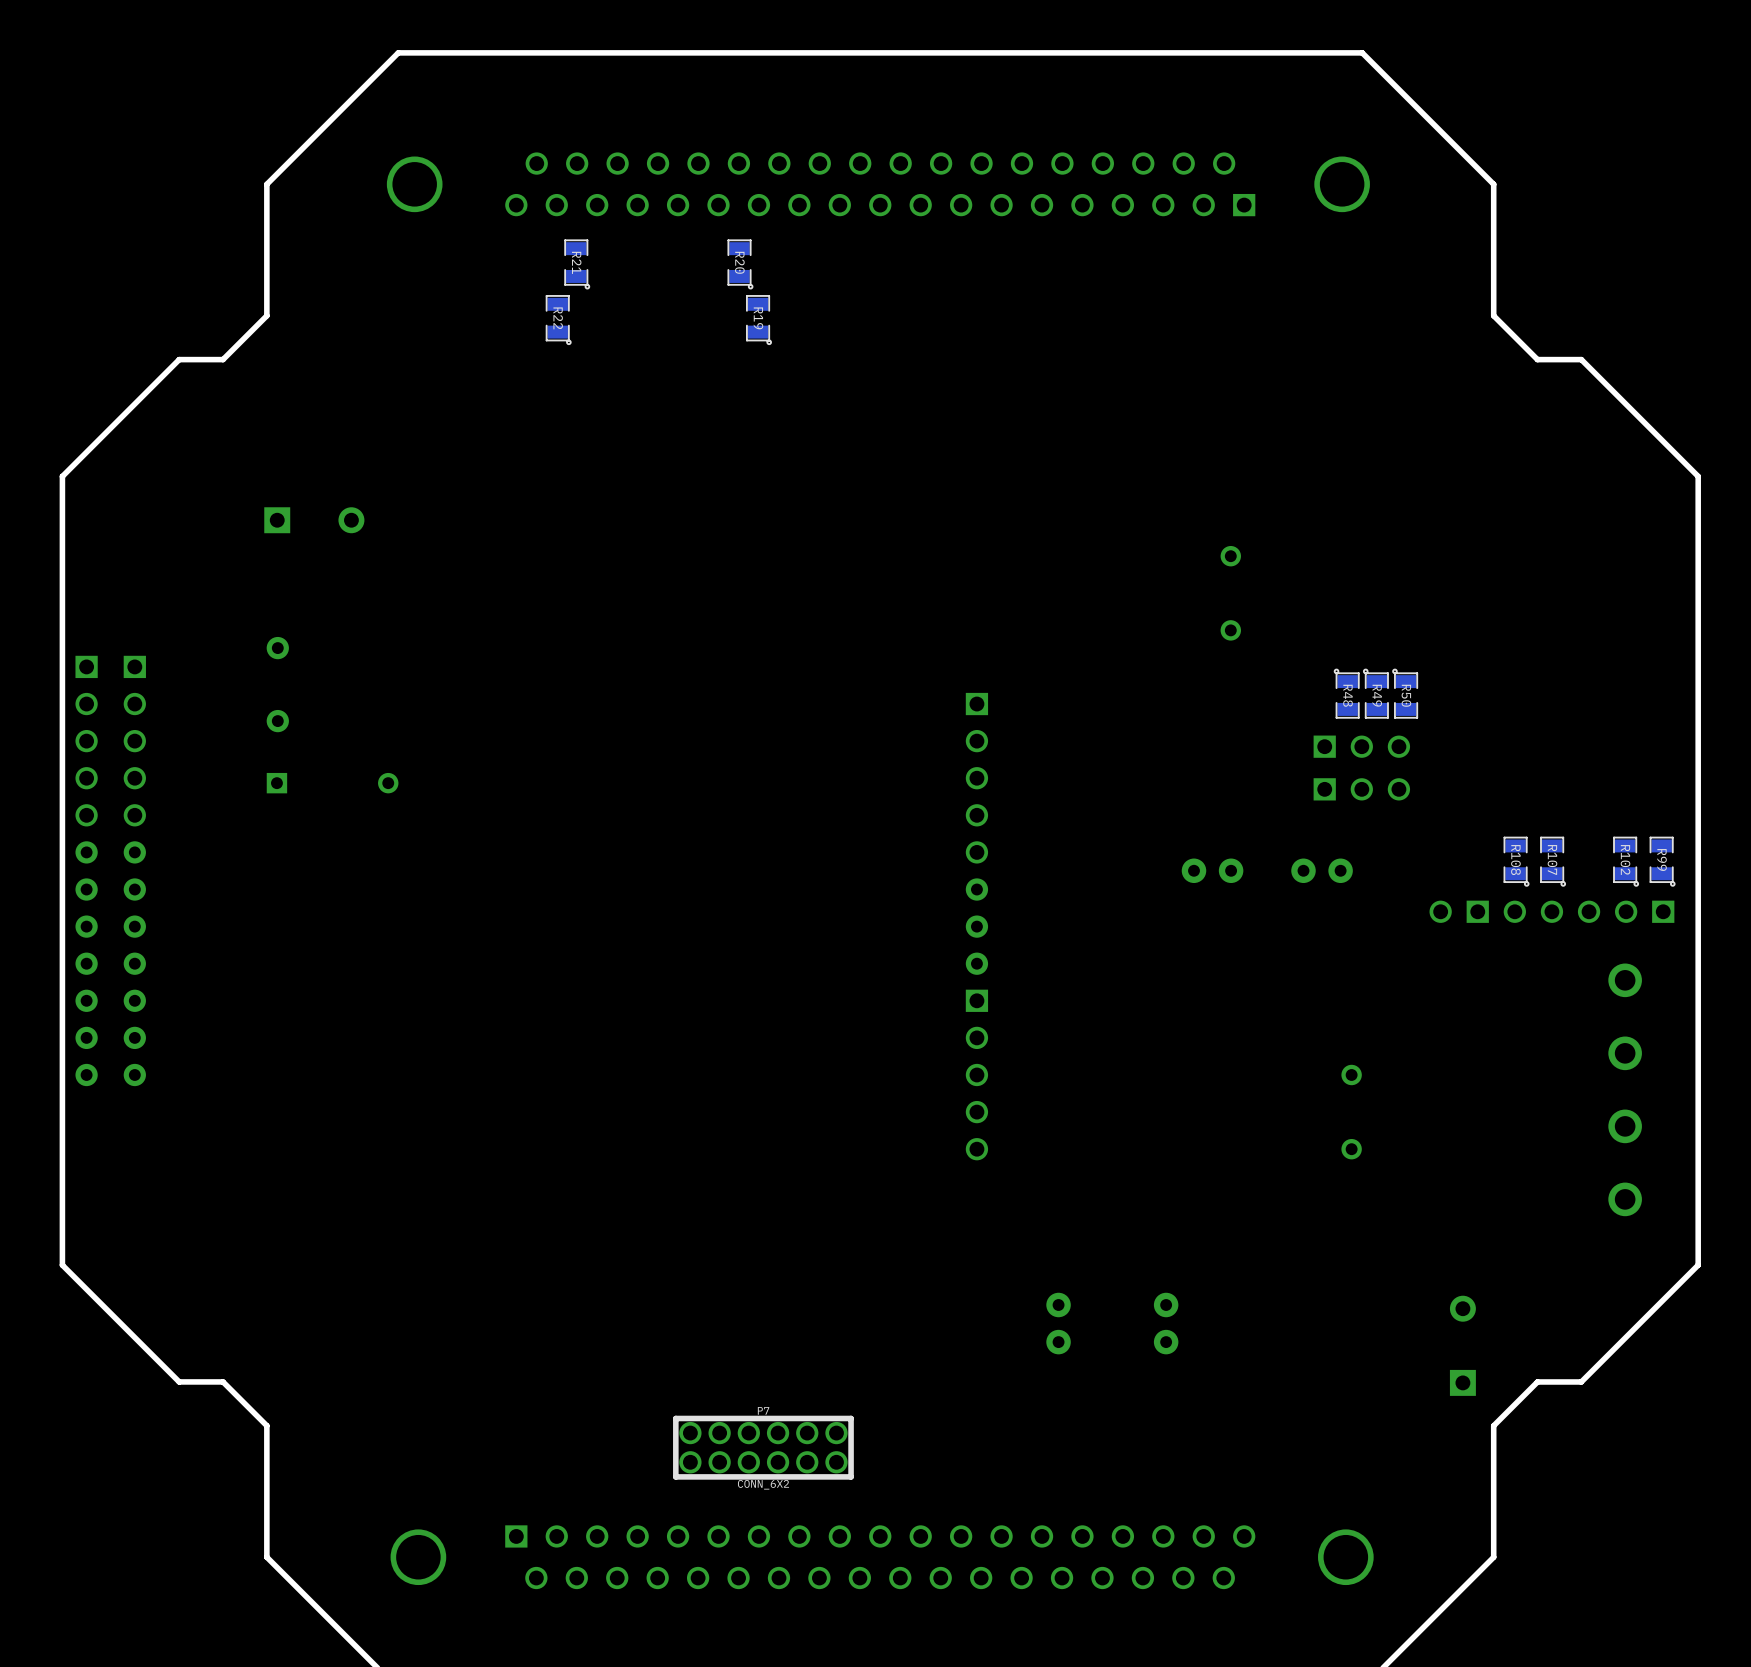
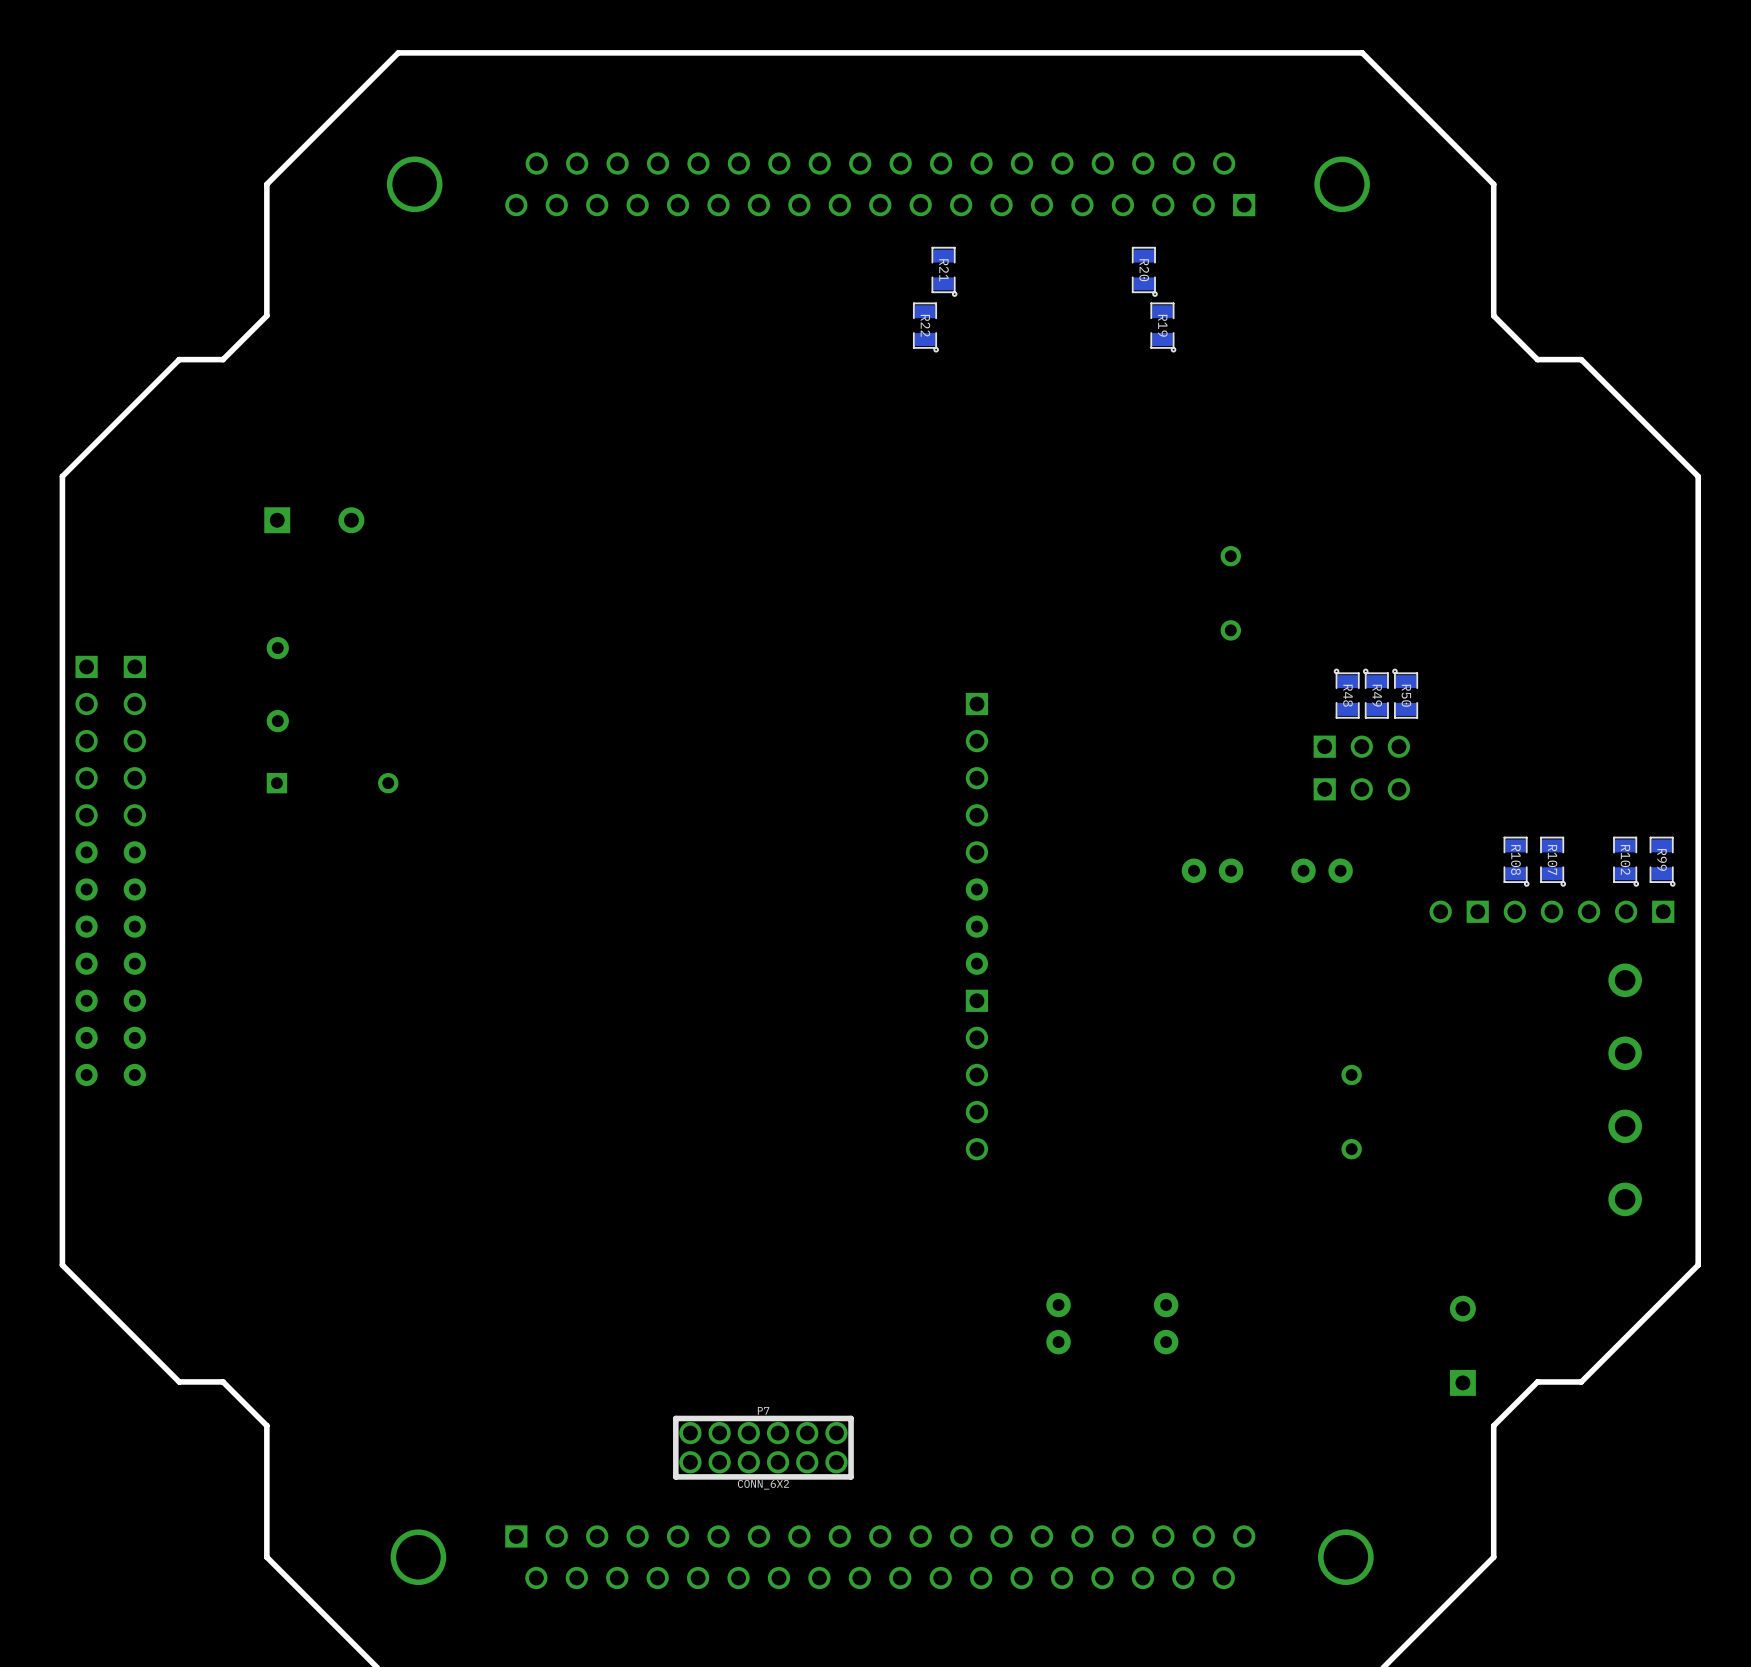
R21 position: (577, 264) -> (944, 271)
R20 position: (740, 264) -> (1144, 271)
R22 position: (558, 320) -> (925, 327)
R19 position: (758, 320) -> (1163, 327)

